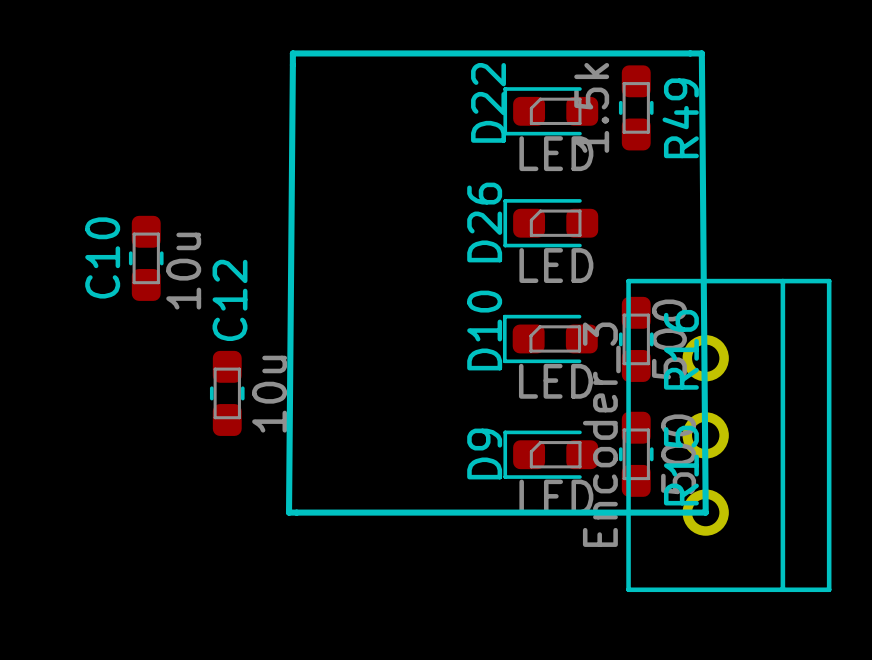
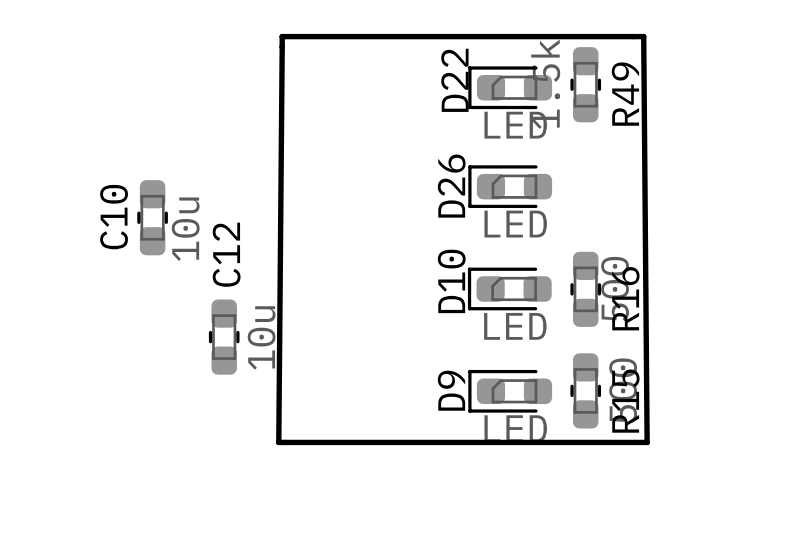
part: Encoder_3 (728, 435) -> none

